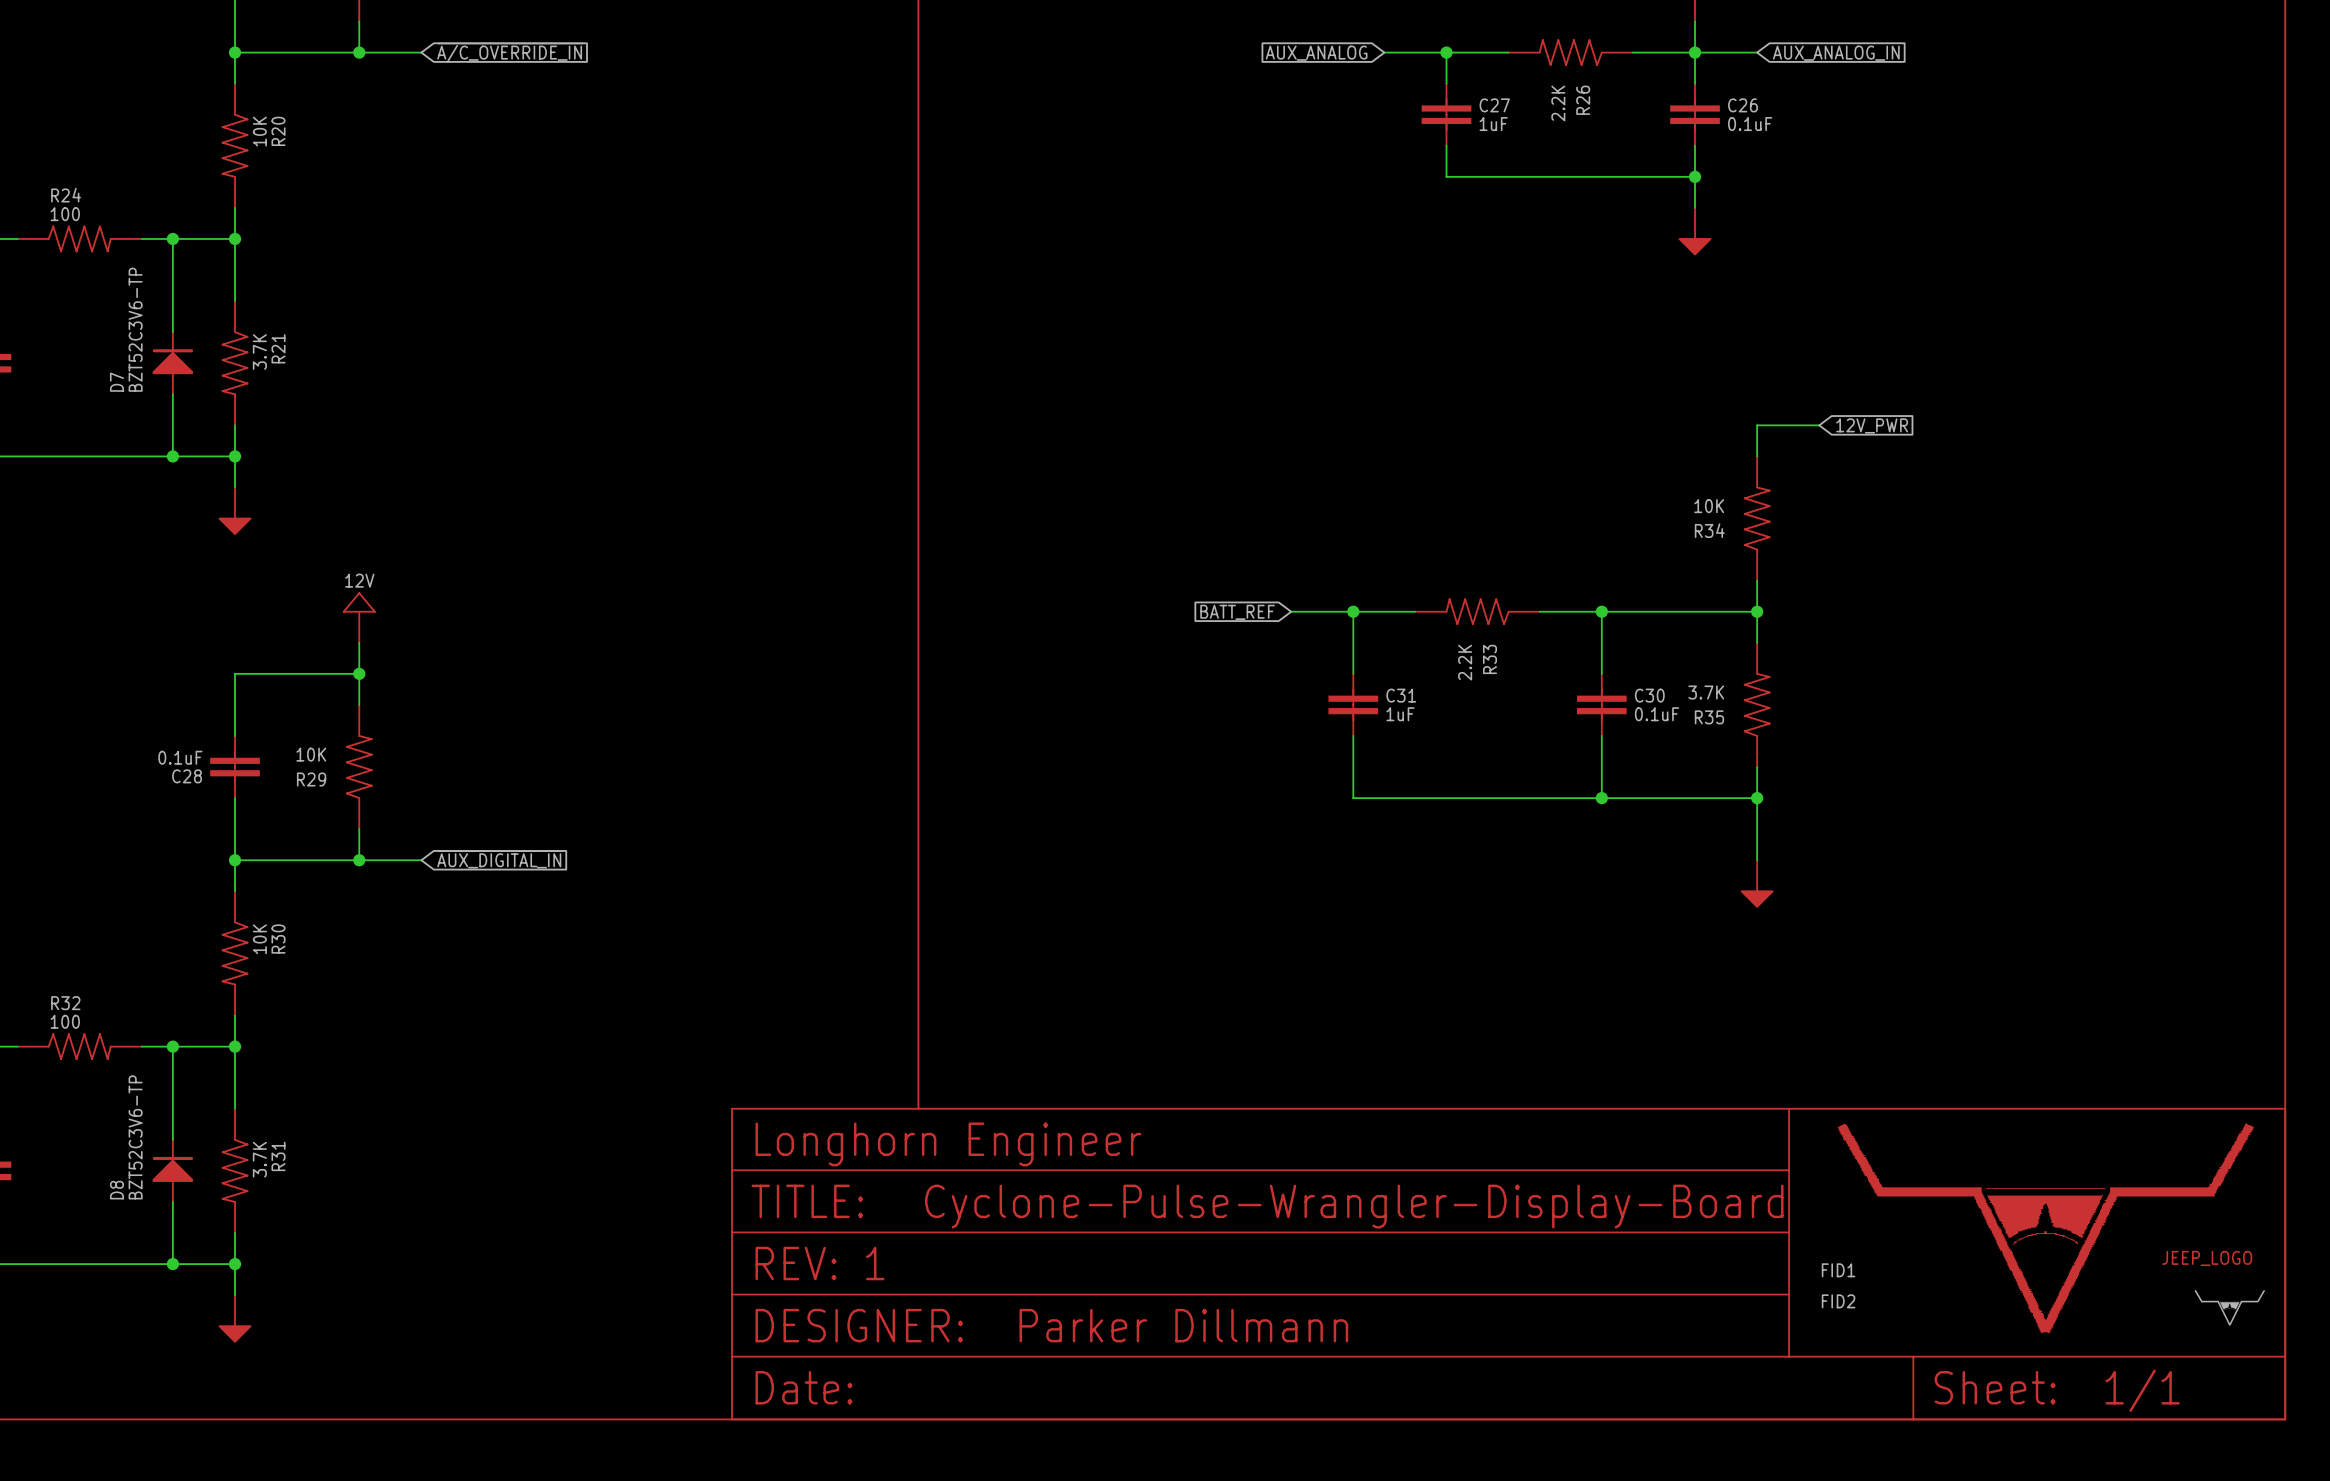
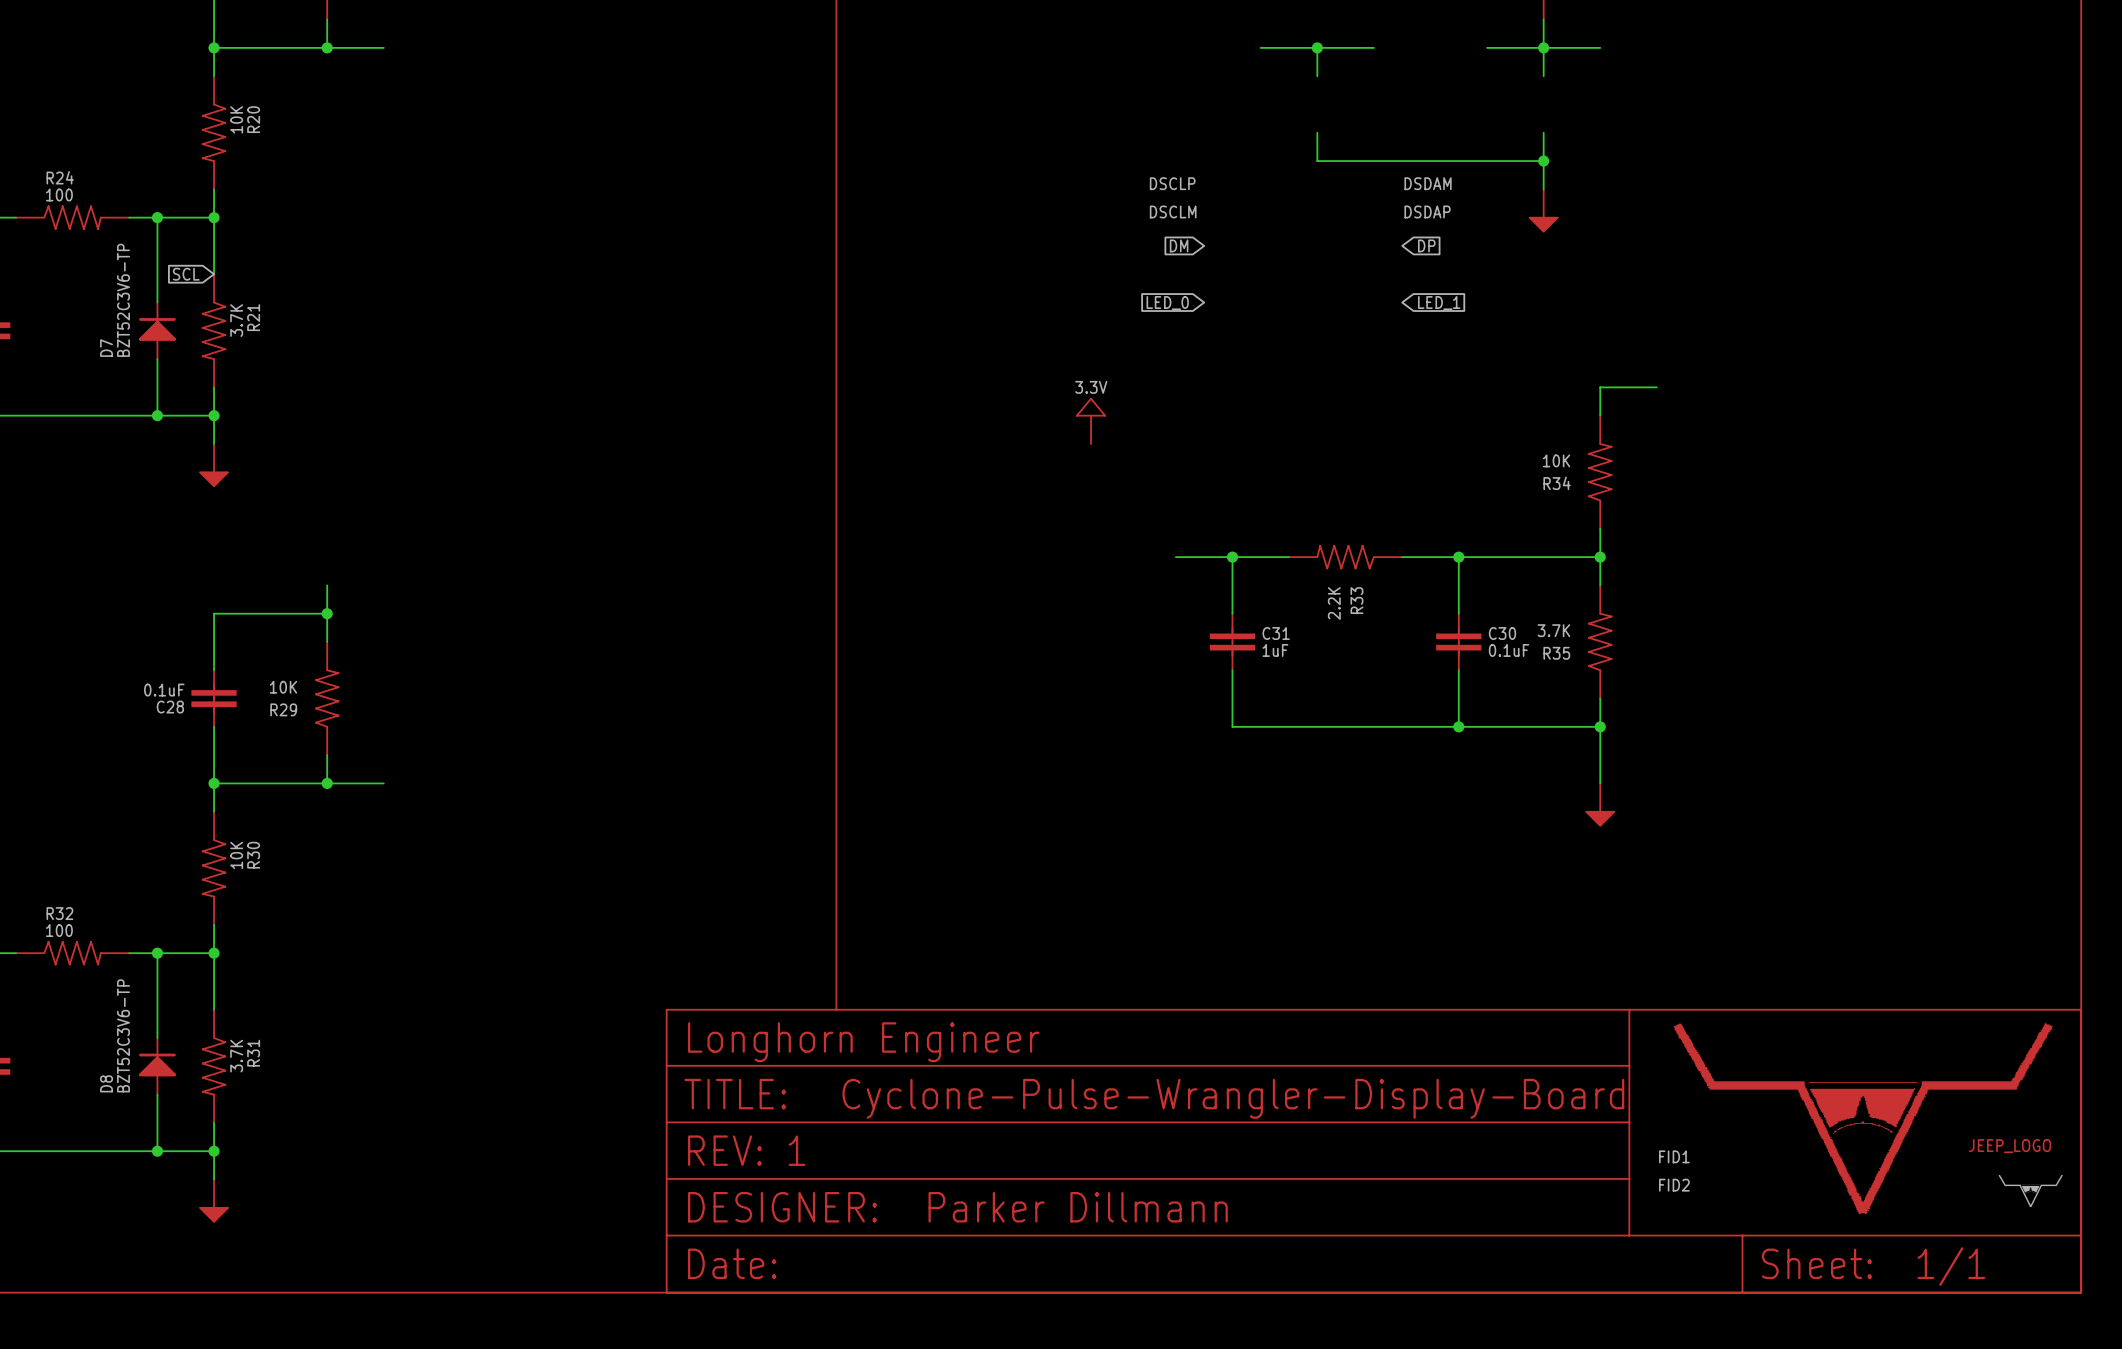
global label: ~{A/C_OVERRIDE_IN} (510, 52) -> none
R26: 2.2K (1570, 52) -> none
global label: AUX_ANALOG (1316, 53) -> none
global label: AUX_ANALOG_IN (1836, 53) -> none
C27: 1uF (1446, 114) -> none
C26: 0.1uF (1695, 114) -> none
label: none -> DSCLP (1172, 183)
label: none -> DSDAM (1428, 183)
label: none -> DSCLM (1173, 211)
label: none -> DSDAP (1427, 211)
global label: none -> DM (1179, 245)
global label: none -> DP (1426, 245)
global label: none -> SCL (186, 274)
global label: none -> LED_0 (1167, 303)
global label: none -> LED_1 (1439, 303)
global label: 12V_PWR (1872, 425) -> none
power symbol: none -> 3.3V (1091, 420)
global label: BATT_REF (1237, 612) -> none
power symbol: 12V (359, 617) -> none
global label: ~{AUX_DIGITAL_IN} (500, 859) -> none

